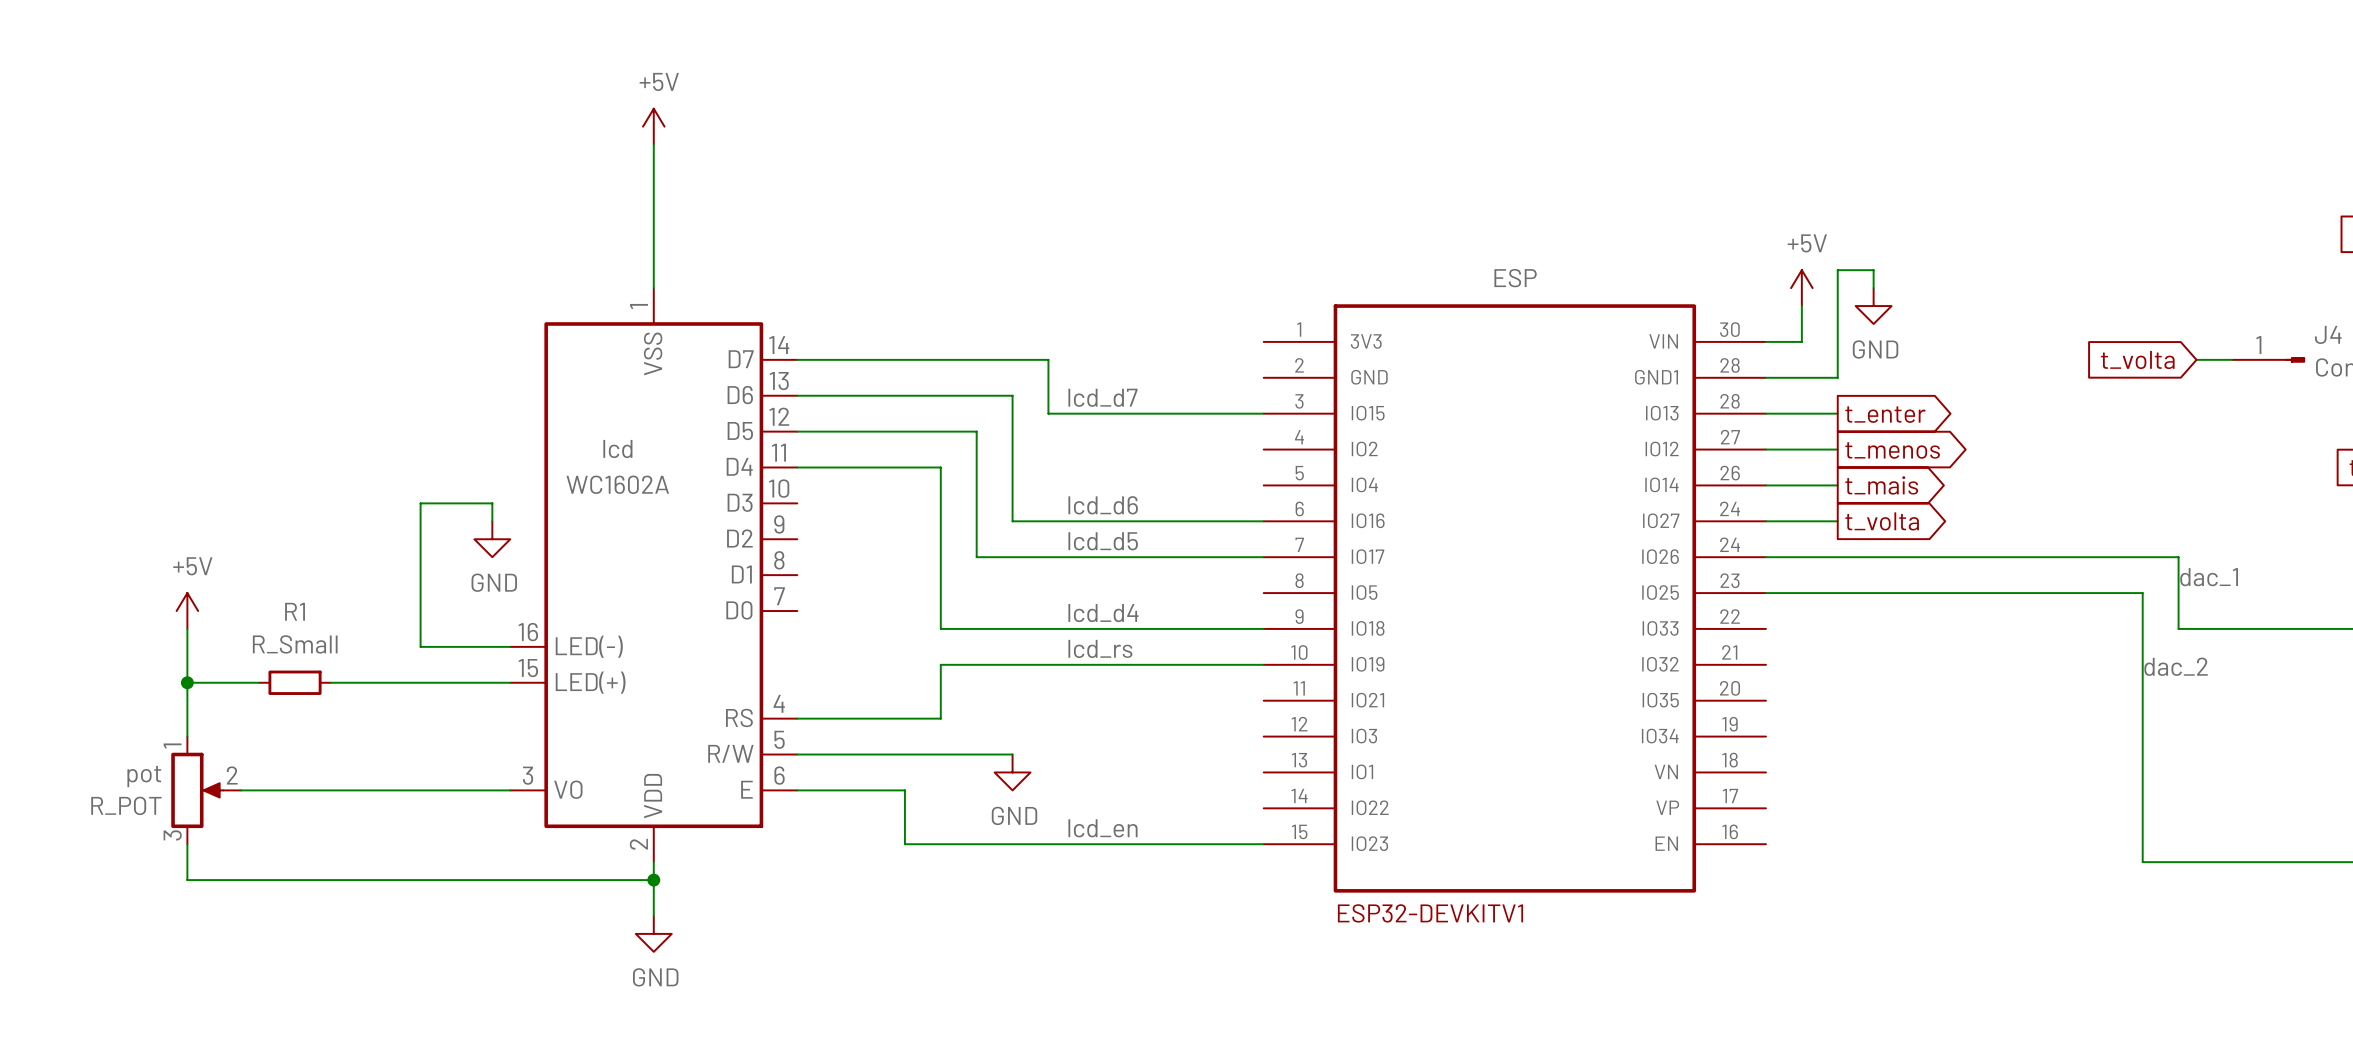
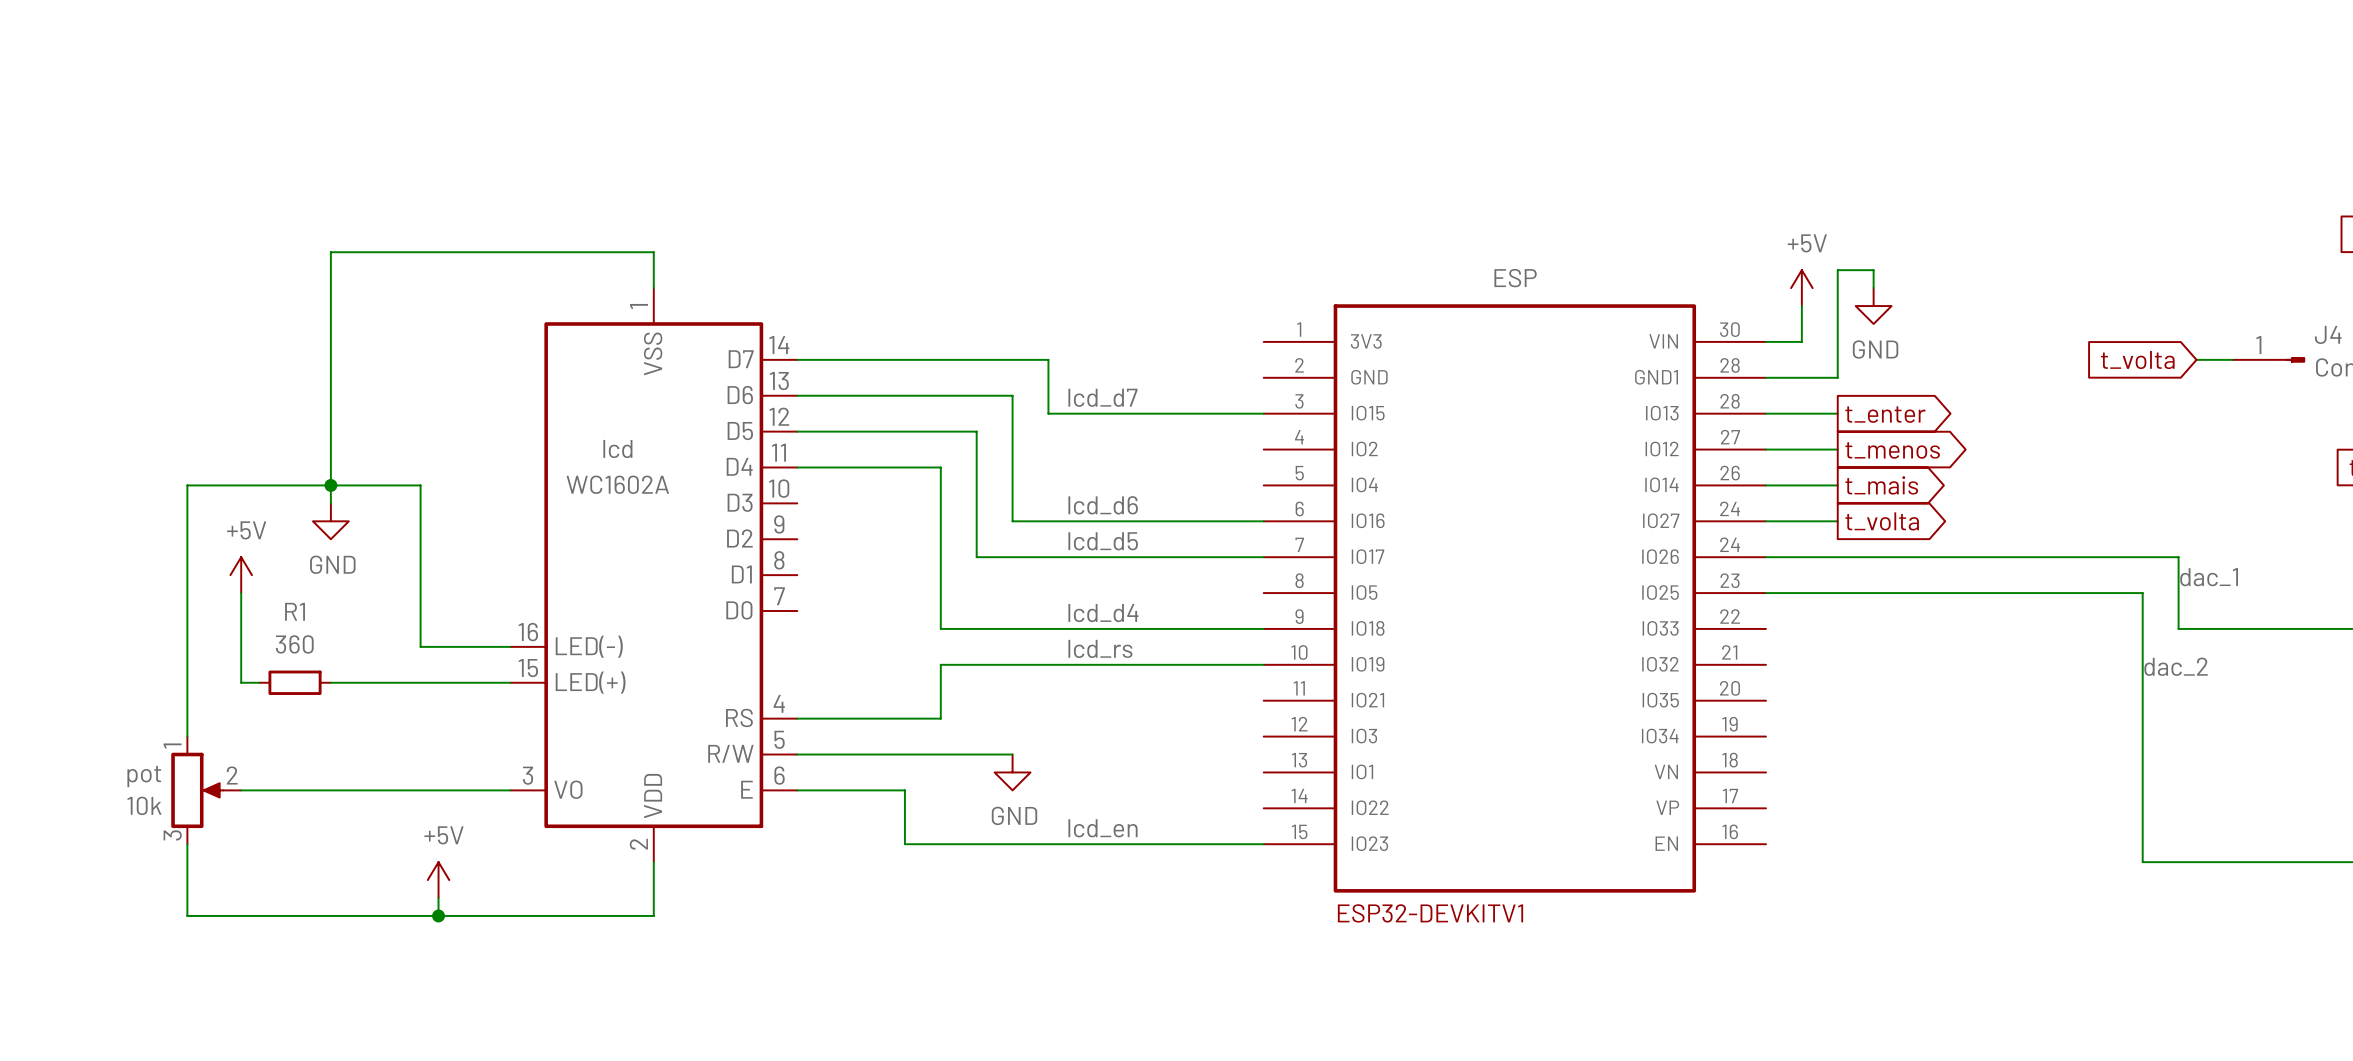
power symbol: +5V (653, 126) -> none
wire: (653, 144) (653, 252) -> (330, 503) (330, 252) (653, 252)
junction: none -> (330, 485)
wire: (420, 503) (492, 503) (492, 521) -> (420, 503) (420, 485) (187, 485) (187, 628)
power symbol position: GND (492, 539) -> GND (330, 521)
power symbol position: +5V (187, 611) -> +5V (241, 575)
R1 value: R_Small (295, 644) -> 360 (294, 644)
wire: (187, 682) (241, 682) -> (241, 593) (241, 682)
junction: (187, 682) -> none
pot value: R_POT (126, 805) -> 10k (144, 805)
wire: (187, 880) (653, 880) -> (187, 880) (187, 915) (653, 915)
power symbol: none -> +5V (438, 880)
junction: (653, 880) -> none
wire: none -> (438, 898) (438, 915)
junction: none -> (438, 915)
power symbol: GND (653, 933) -> none

